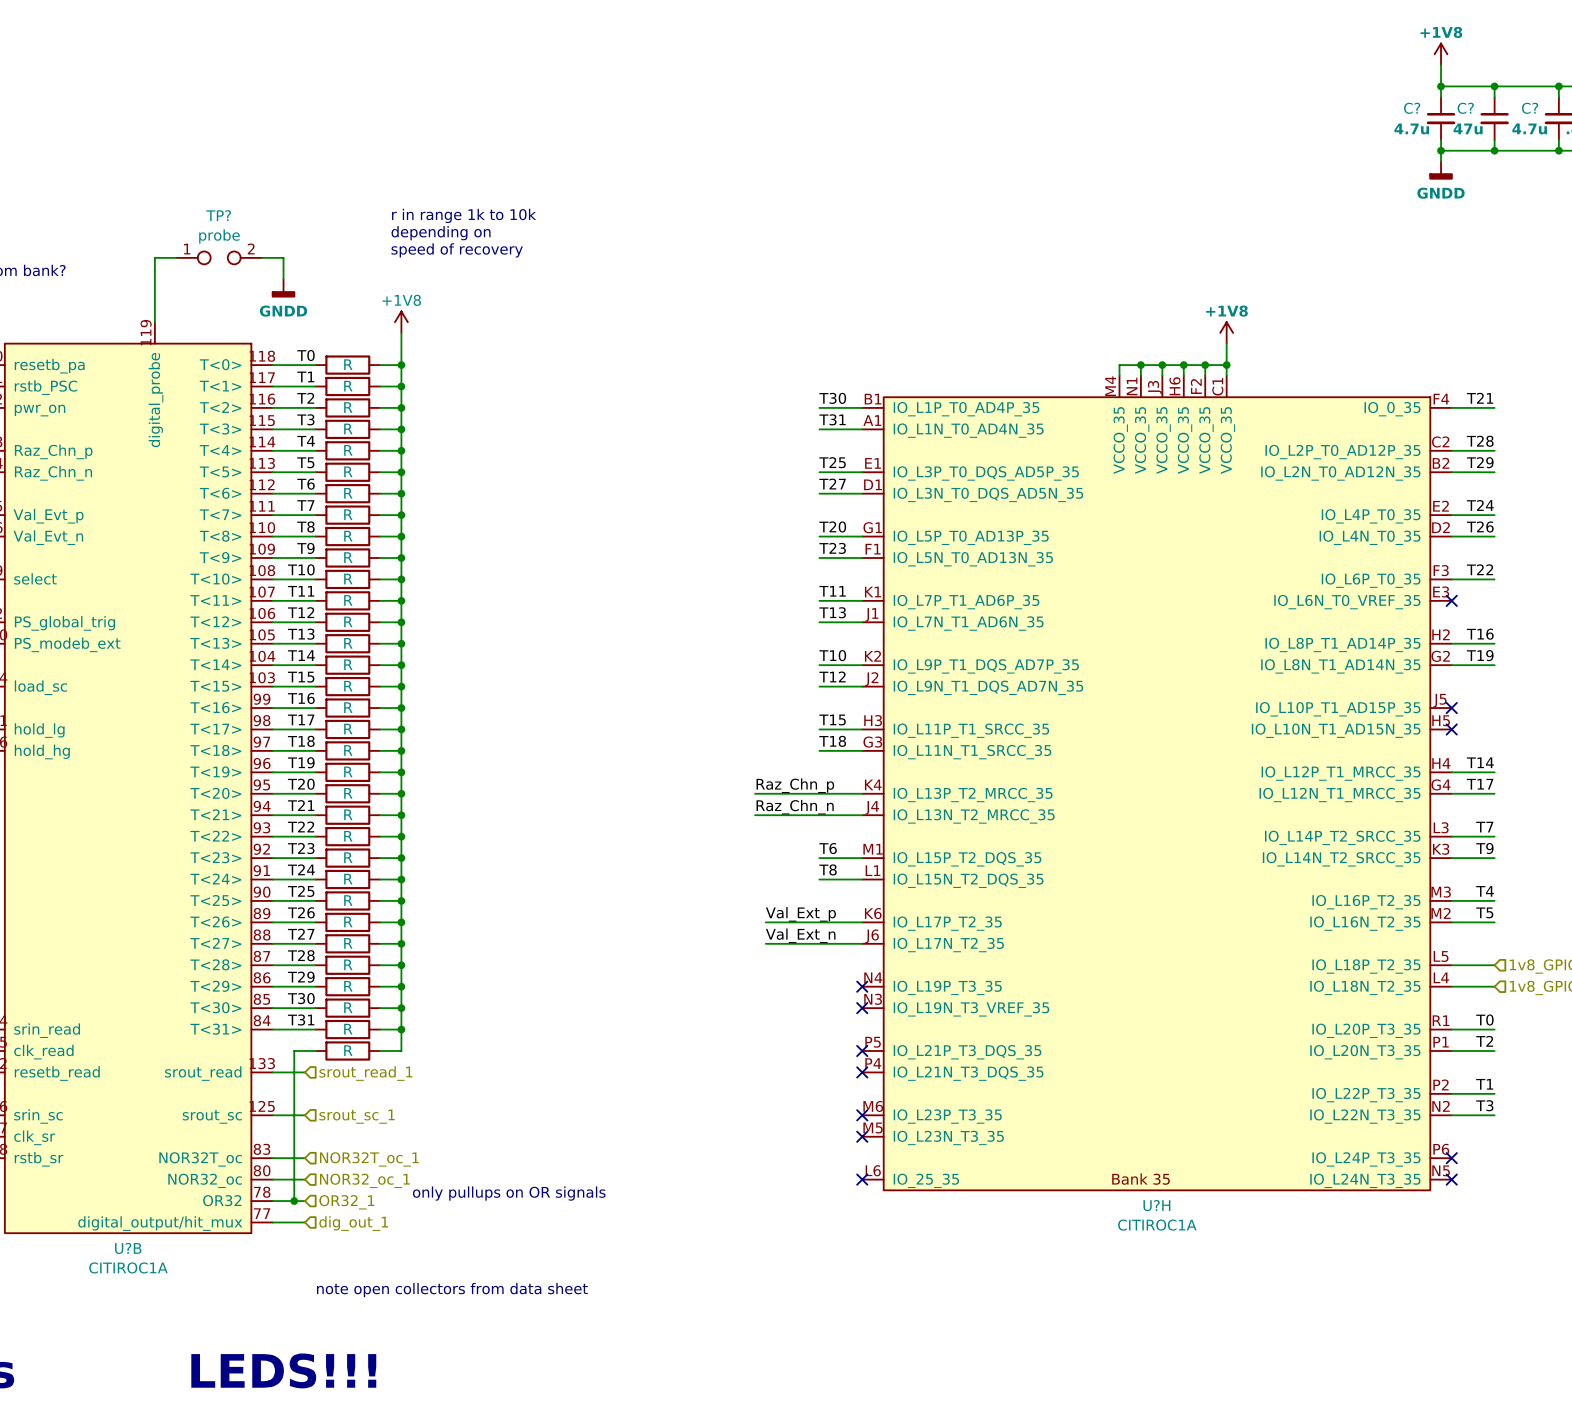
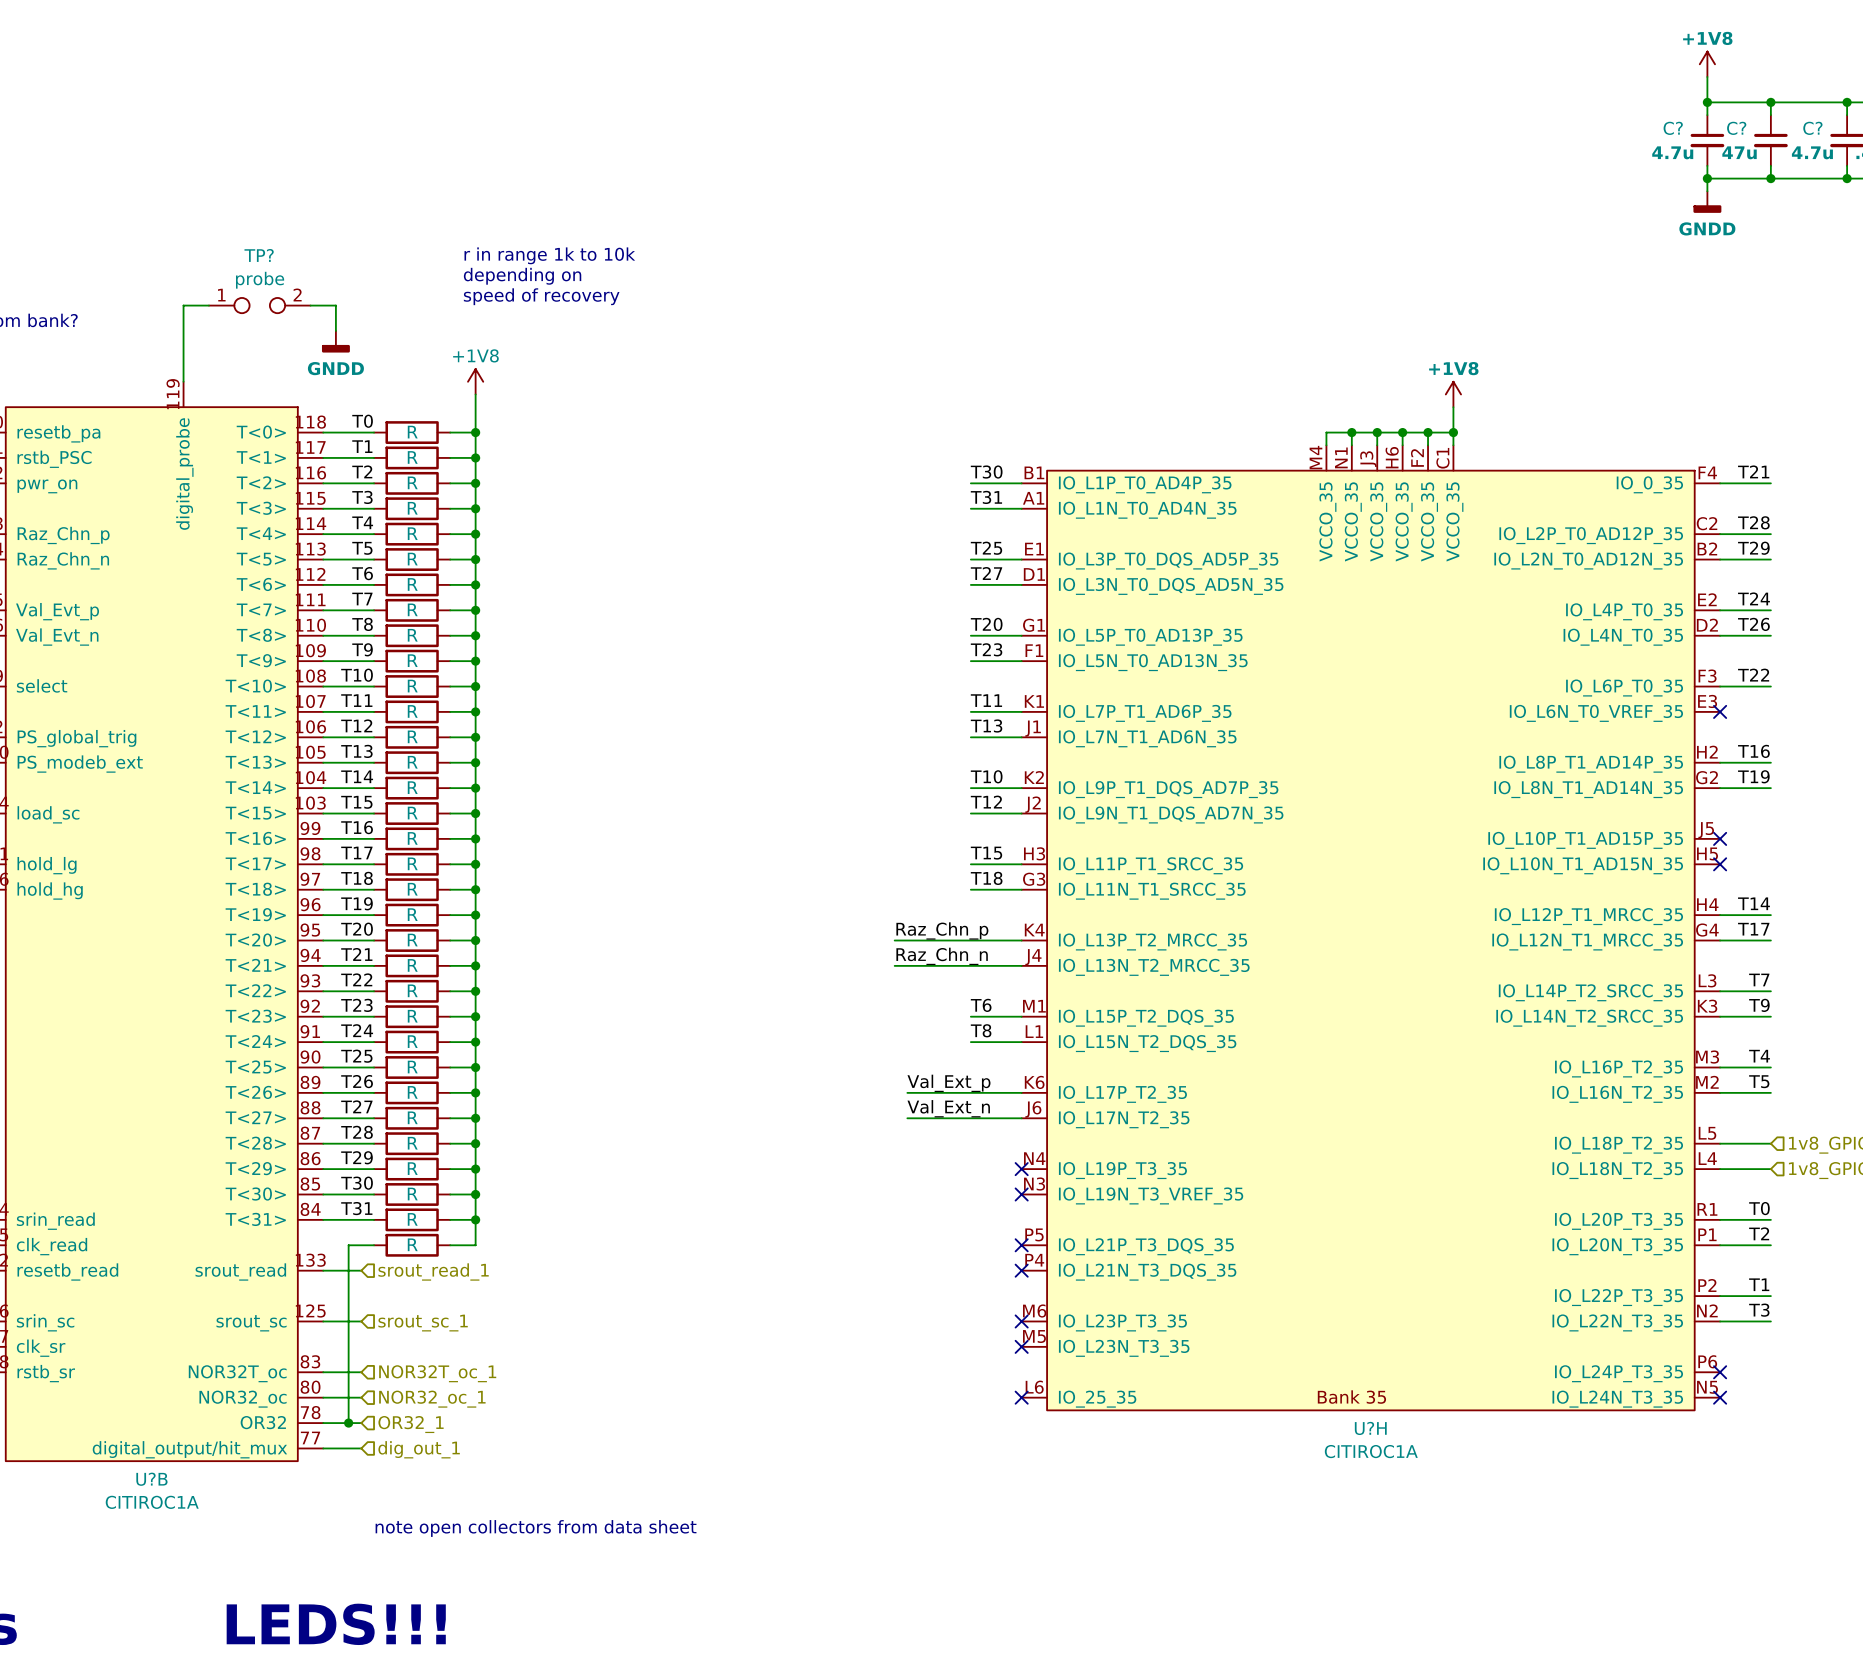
text: only pullups on OR signals (509, 1193) -> none

